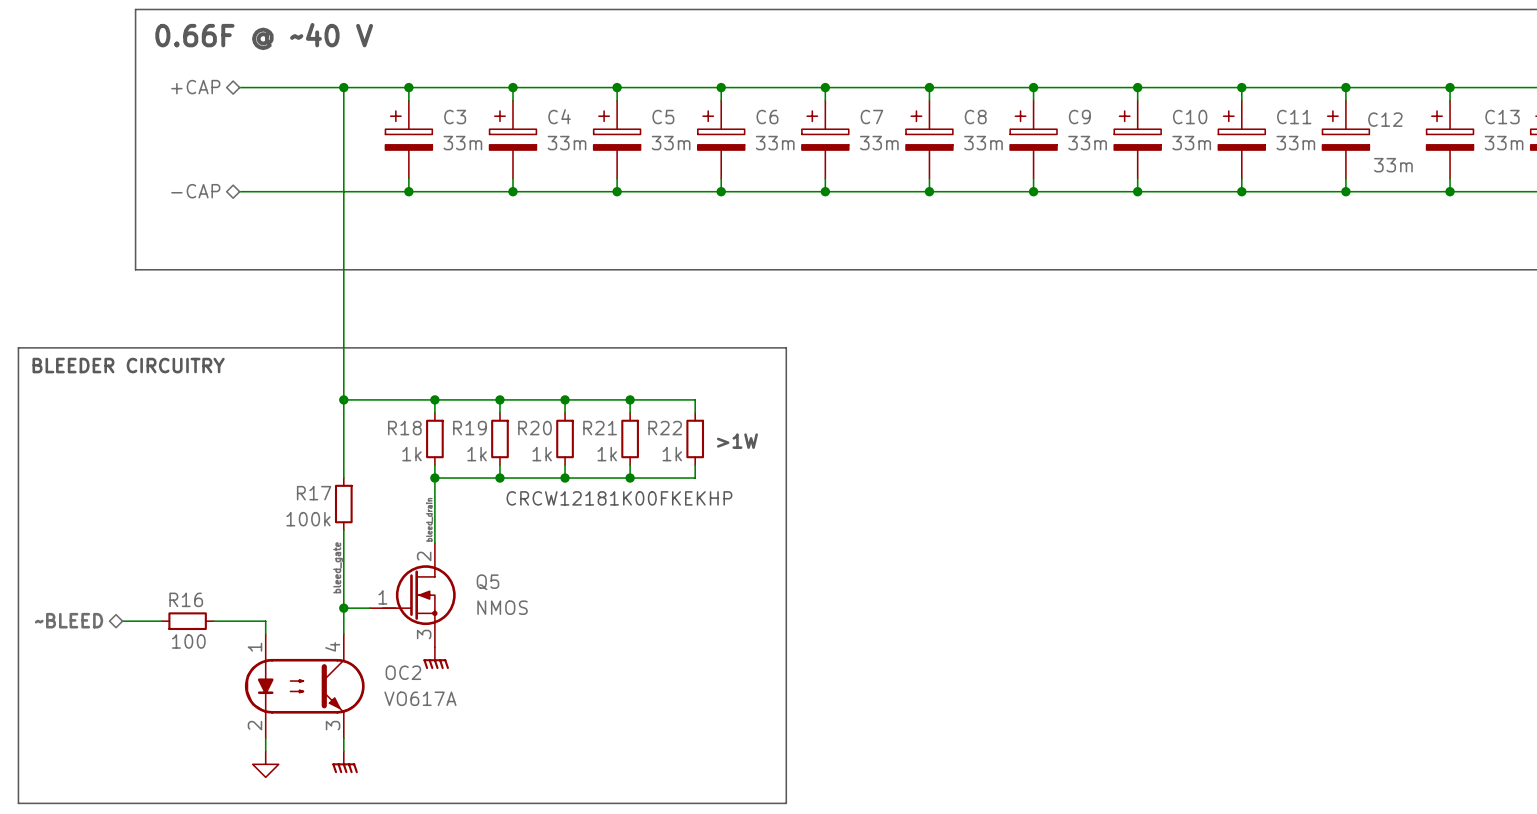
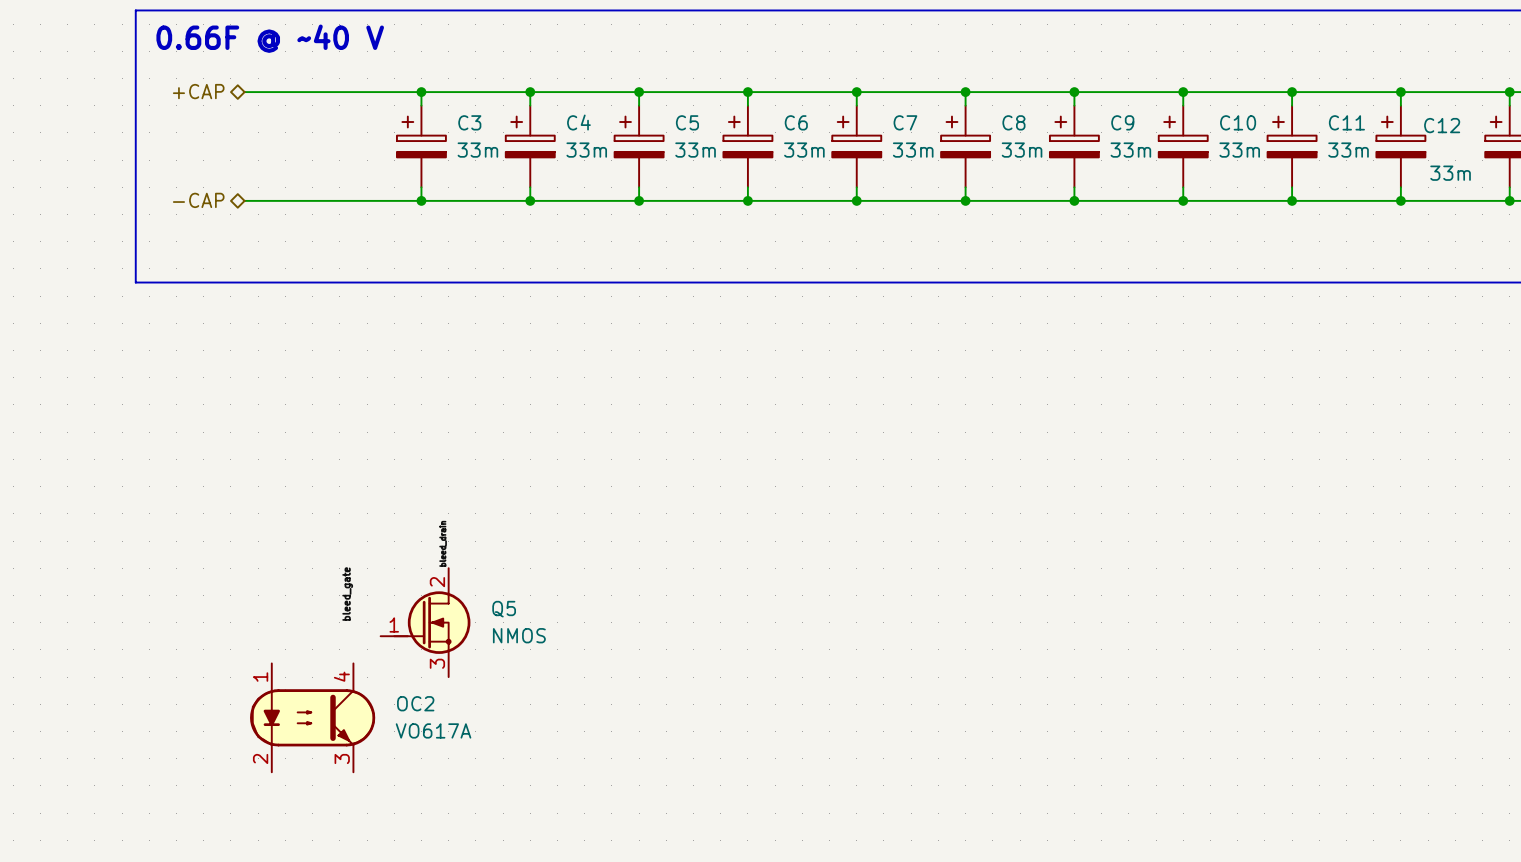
wire: (343, 87) (343, 478) -> none
junction: (343, 87) -> none
line: (18, 347) (786, 347) (786, 803) (18, 803) (18, 347) -> none
text: BLEEDER CIRCUITRY (128, 365) -> none
wire: (343, 399) (695, 399) (695, 412) -> none
junction: (343, 399) -> none
wire: (434, 399) (434, 412) -> none
junction: (434, 399) -> none
wire: (499, 399) (499, 412) -> none
junction: (499, 399) -> none
wire: (565, 399) (565, 412) -> none
junction: (565, 399) -> none
wire: (630, 399) (630, 412) -> none
junction: (630, 399) -> none
R18: 1k (434, 438) -> none
R19: 1k (499, 438) -> none
R20: 1k (565, 438) -> none
R21: 1k (630, 438) -> none
R22: 1k (695, 438) -> none
text: >1W (737, 441) -> none
wire: (434, 465) (434, 543) -> none
wire: (499, 465) (499, 478) -> none
wire: (565, 465) (565, 478) -> none
wire: (630, 465) (630, 478) -> none
wire: (695, 465) (695, 478) (434, 478) -> none
junction: (434, 478) -> none
junction: (499, 478) -> none
junction: (565, 478) -> none
junction: (630, 478) -> none
text: CRCW12181K00FKEKHP (619, 498) -> none
R17: 100k (343, 504) -> none
wire: (343, 530) (343, 634) -> none
wire: (343, 608) (369, 608) -> none
junction: (343, 608) -> none
hierarchical label: ~BLEED (68, 620) -> none
wire: (122, 621) (161, 621) -> none
R16: 100 (187, 621) -> none
wire: (213, 621) (265, 621) (265, 634) -> none
power symbol: (436, 658) -> none
wire: (265, 738) (265, 751) -> none
wire: (343, 738) (343, 751) -> none
power symbol: (345, 762) -> none
power symbol: (265, 764) -> none

